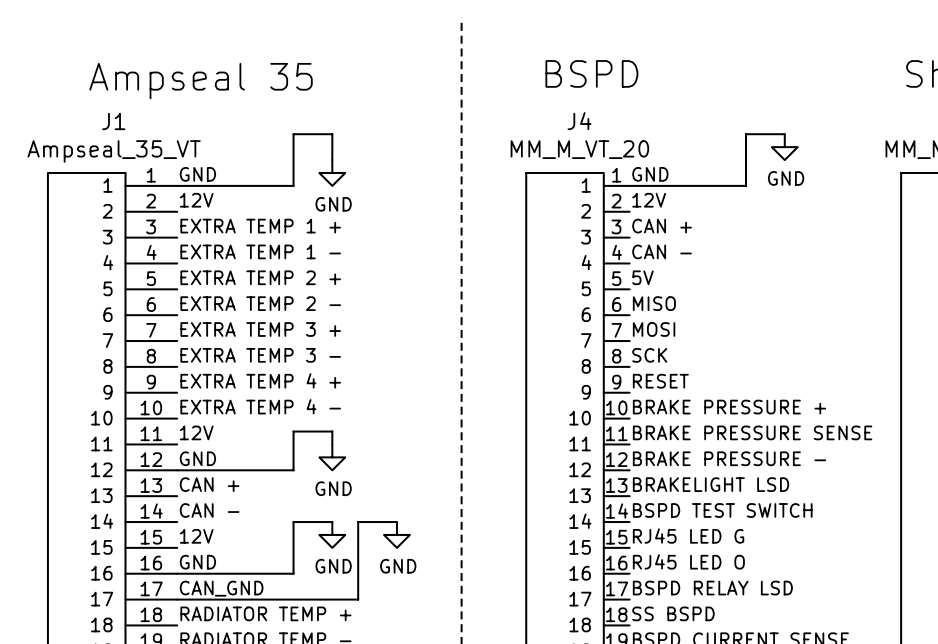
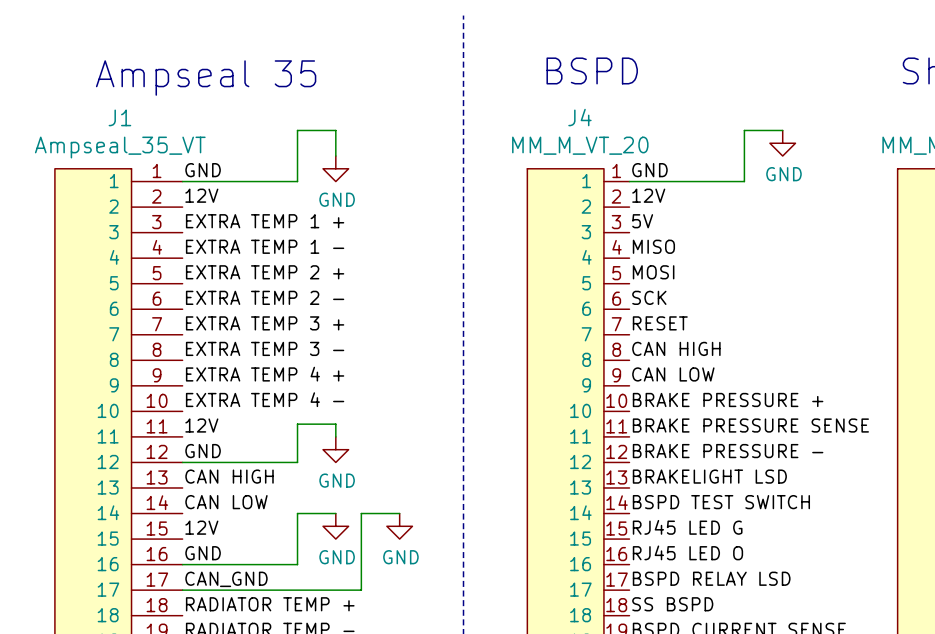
label: CAN + (662, 226) -> 5V (642, 221)
label: CAN - (662, 251) -> MISO (653, 246)
label: 5V (642, 277) -> MOSI (653, 272)
label: MISO (654, 303) -> SCK (649, 297)
label: MOSI (654, 329) -> RESET (660, 323)
label: SCK (649, 355) -> CAN HIGH (676, 348)
label: RESET (660, 381) -> CAN LOW (673, 374)
label: CAN + (209, 484) -> CAN HIGH (229, 476)
label: CAN - (209, 510) -> CAN LOW (226, 502)

